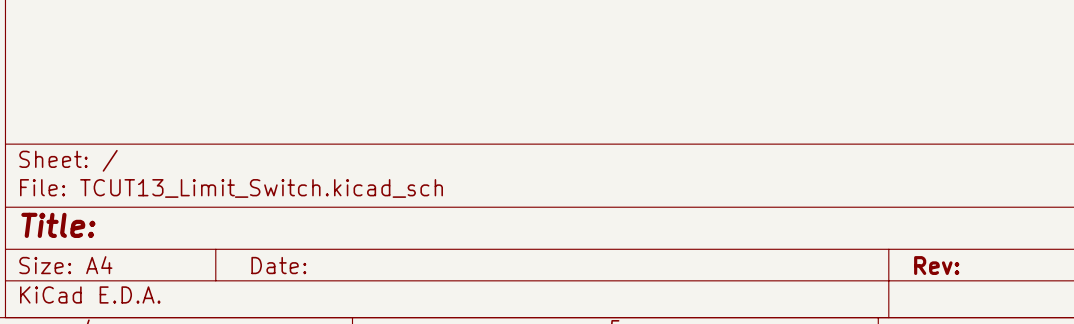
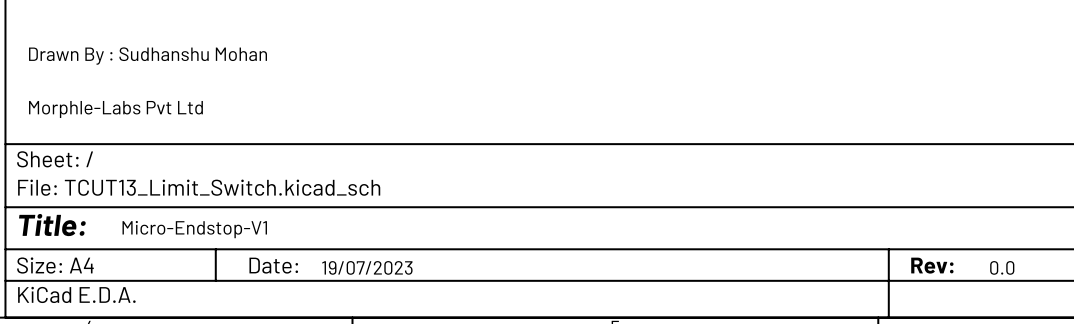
text: none -> Drawn By : Sudhanshu Mohan (148, 56)
text: none -> Morphle-Labs Pvt Ltd (115, 109)
text: none -> Micro-Endstop-V1 (194, 229)
text: none -> 0.0 (1002, 267)
text: none -> 19/07/2023 (367, 267)

